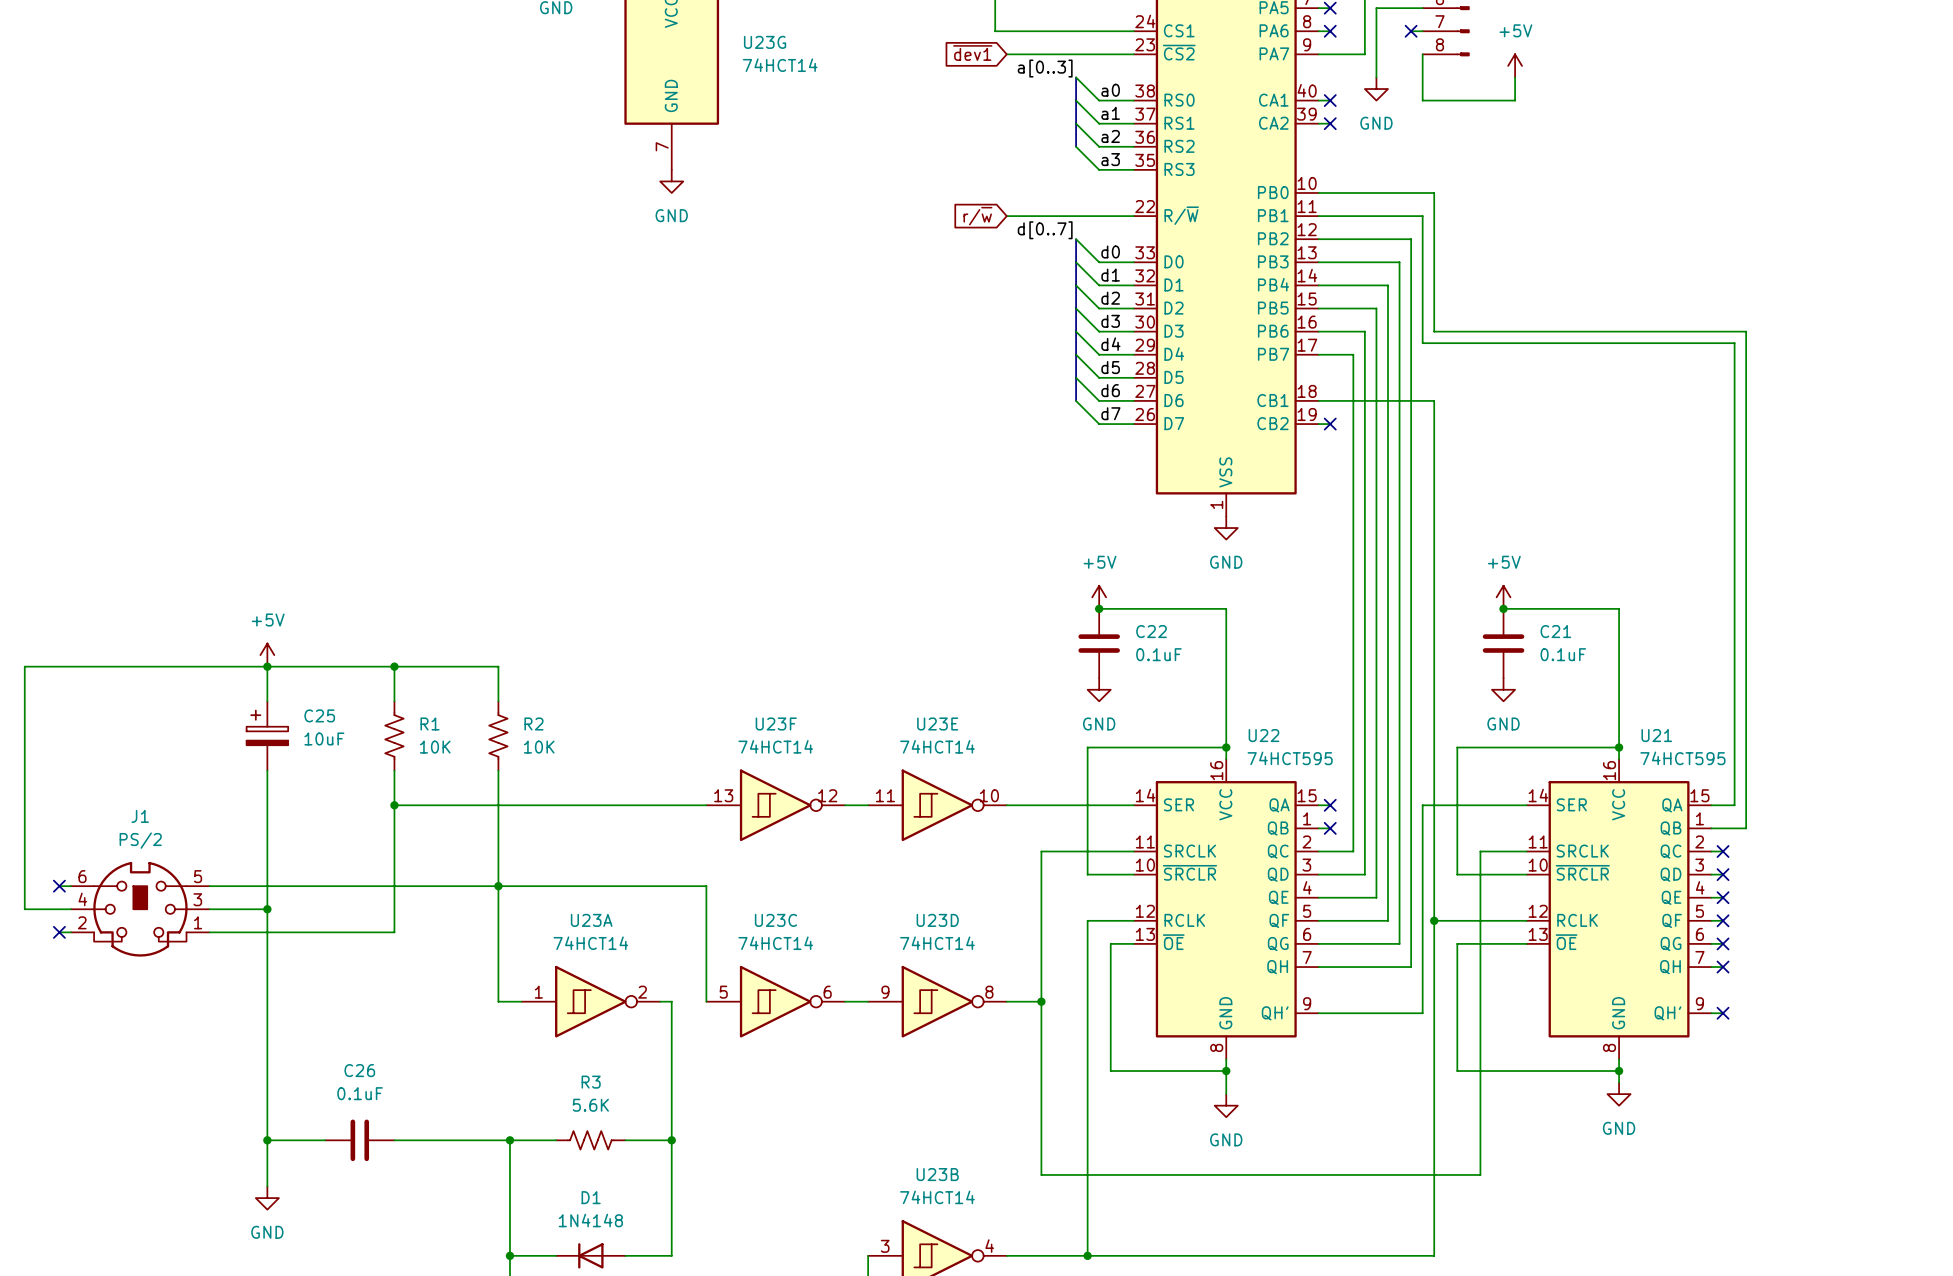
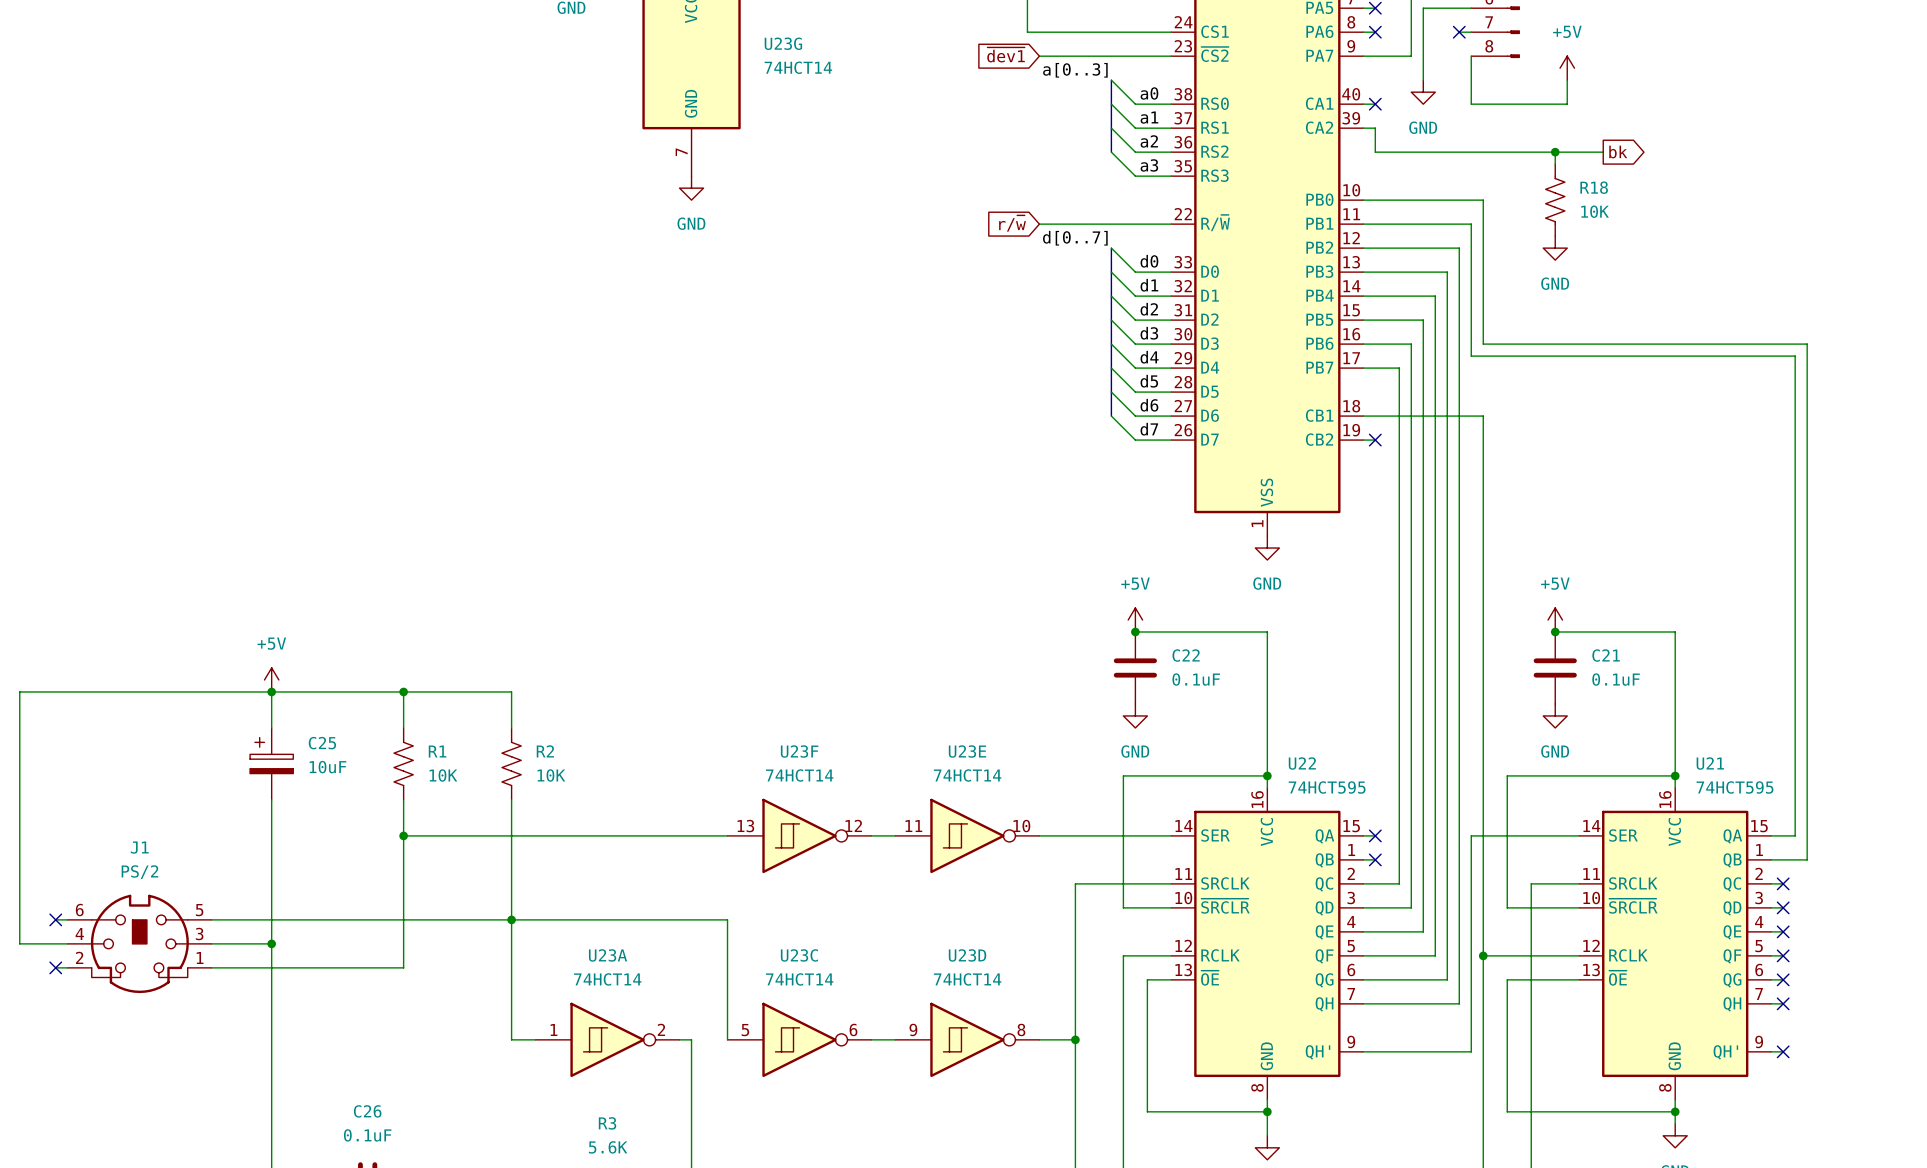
wire: none -> (1375, 128) (1375, 152) (1603, 152)
no-connect mark: (1330, 123) -> none
wire: none -> (1555, 152) (1555, 164)
junction: none -> (1555, 152)
global label: none -> bk (1618, 152)
R18: none -> 10K (1555, 200)
power symbol: none -> GND (1555, 248)

